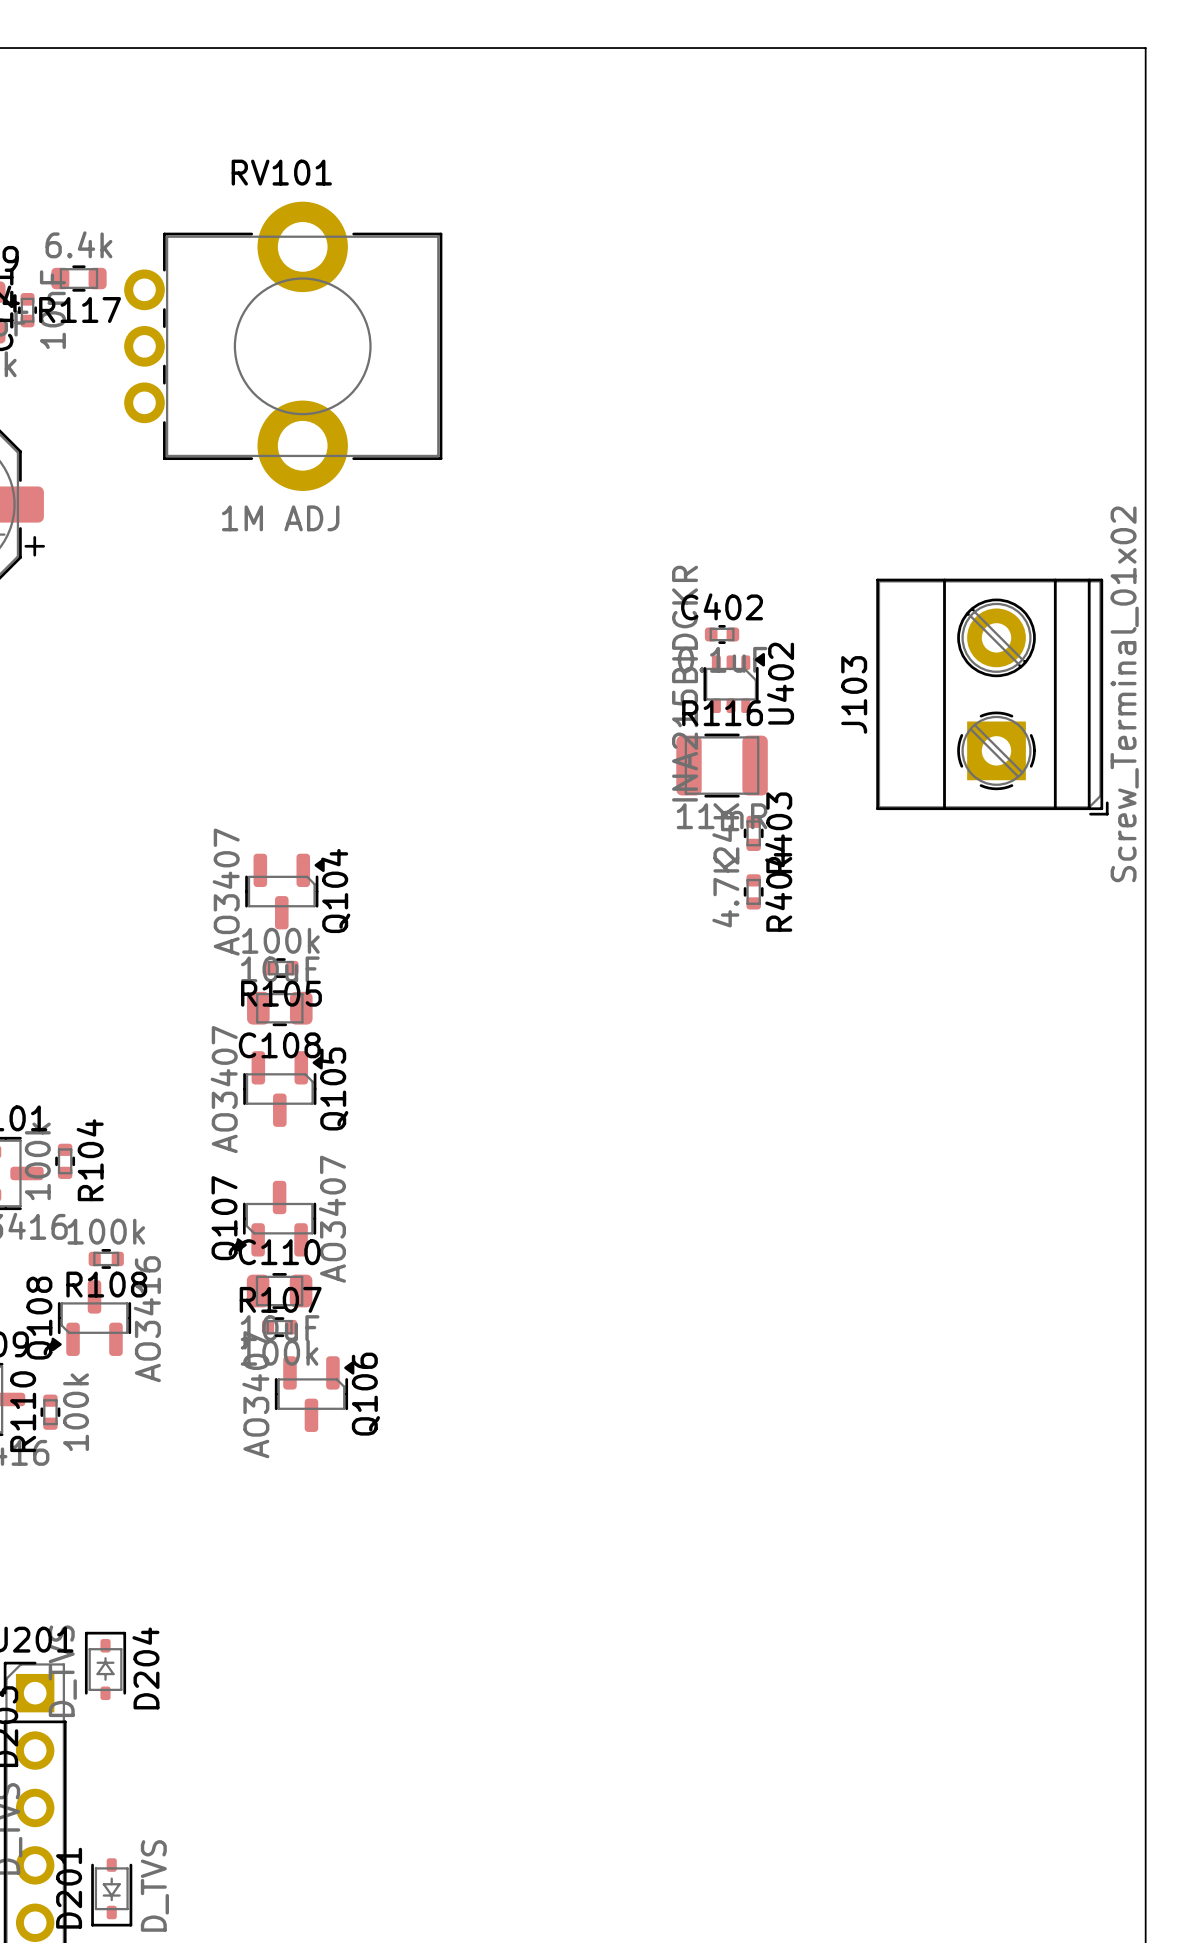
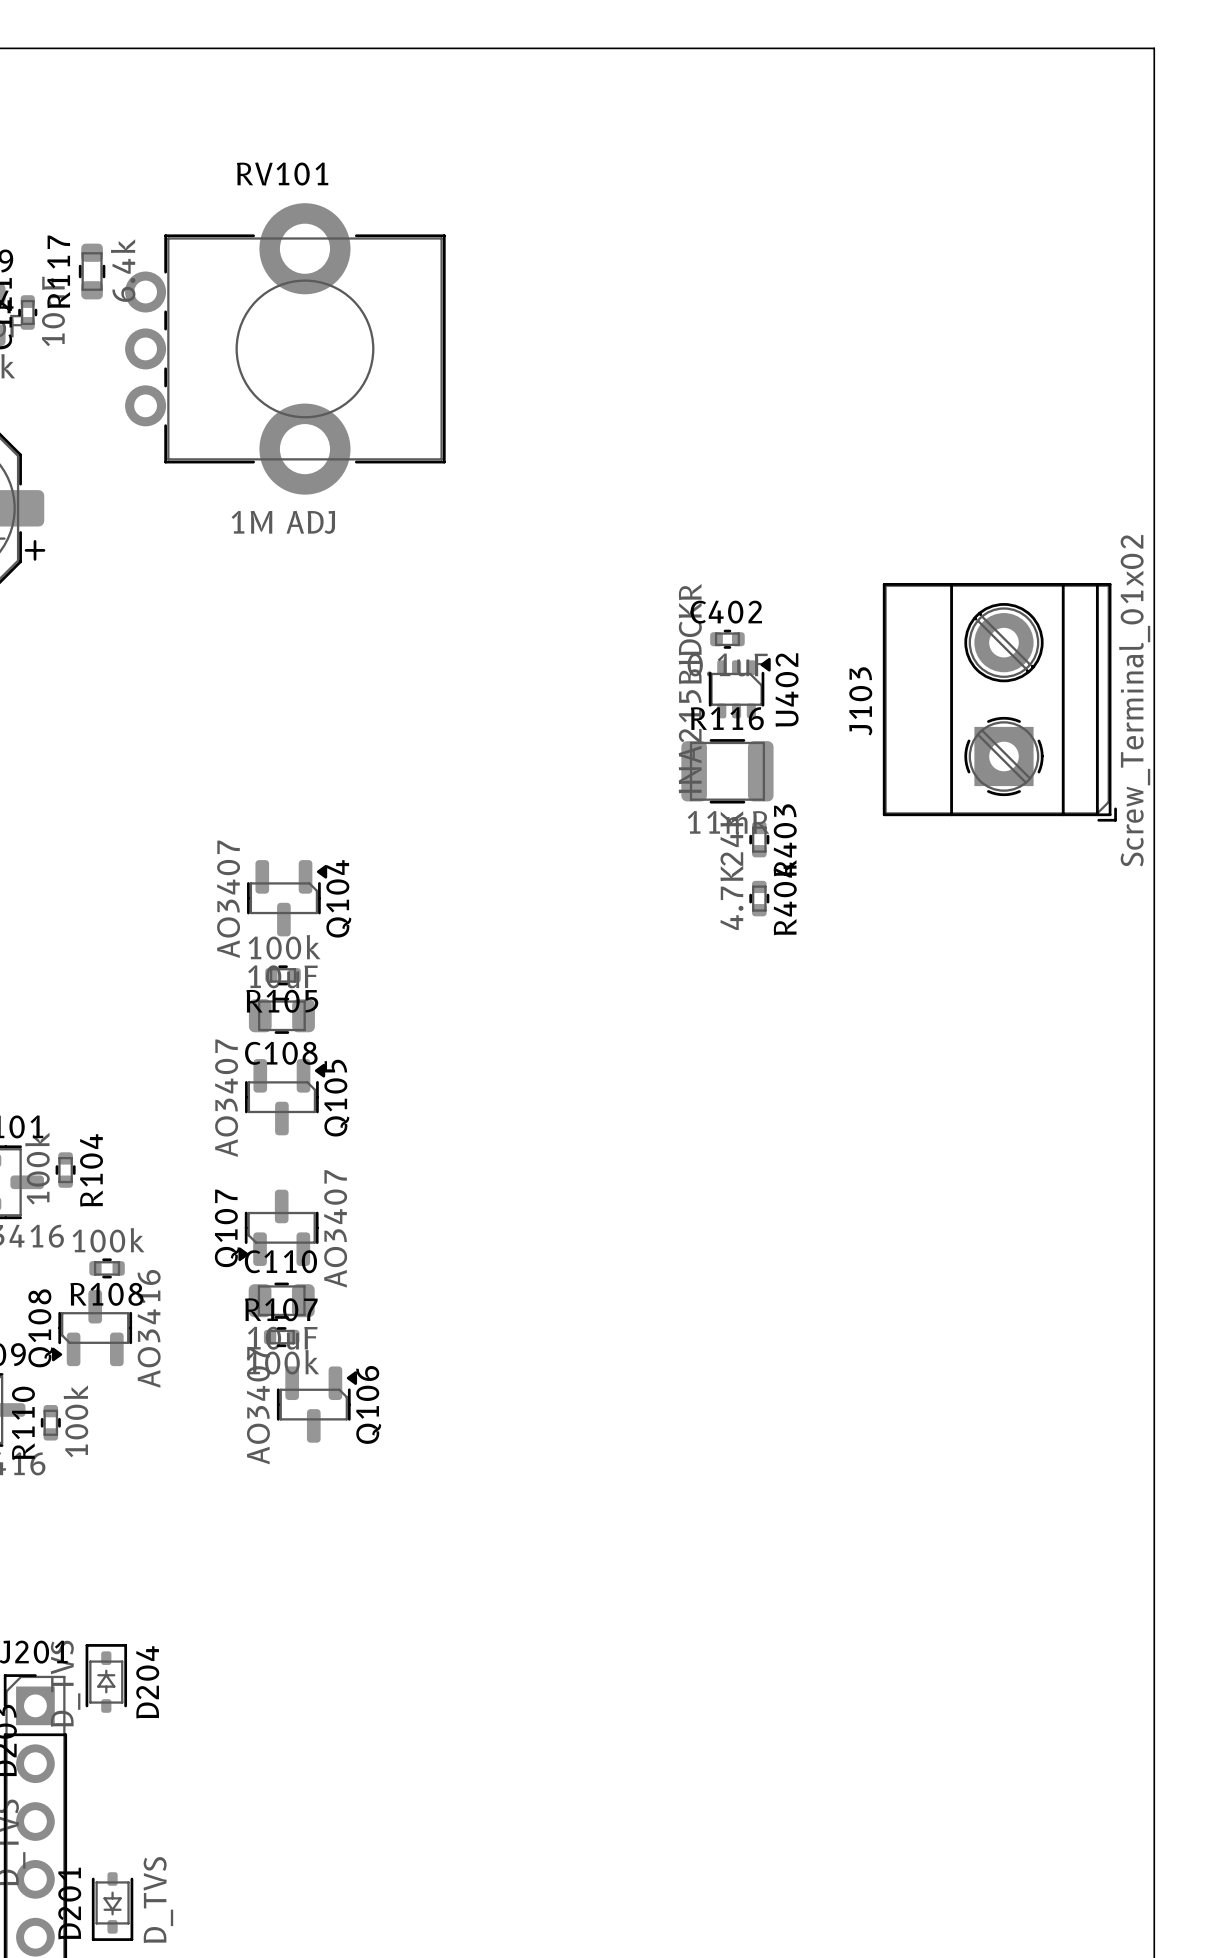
R117 rotation: 0° (78, 278) -> 90° clockwise (92, 271)

